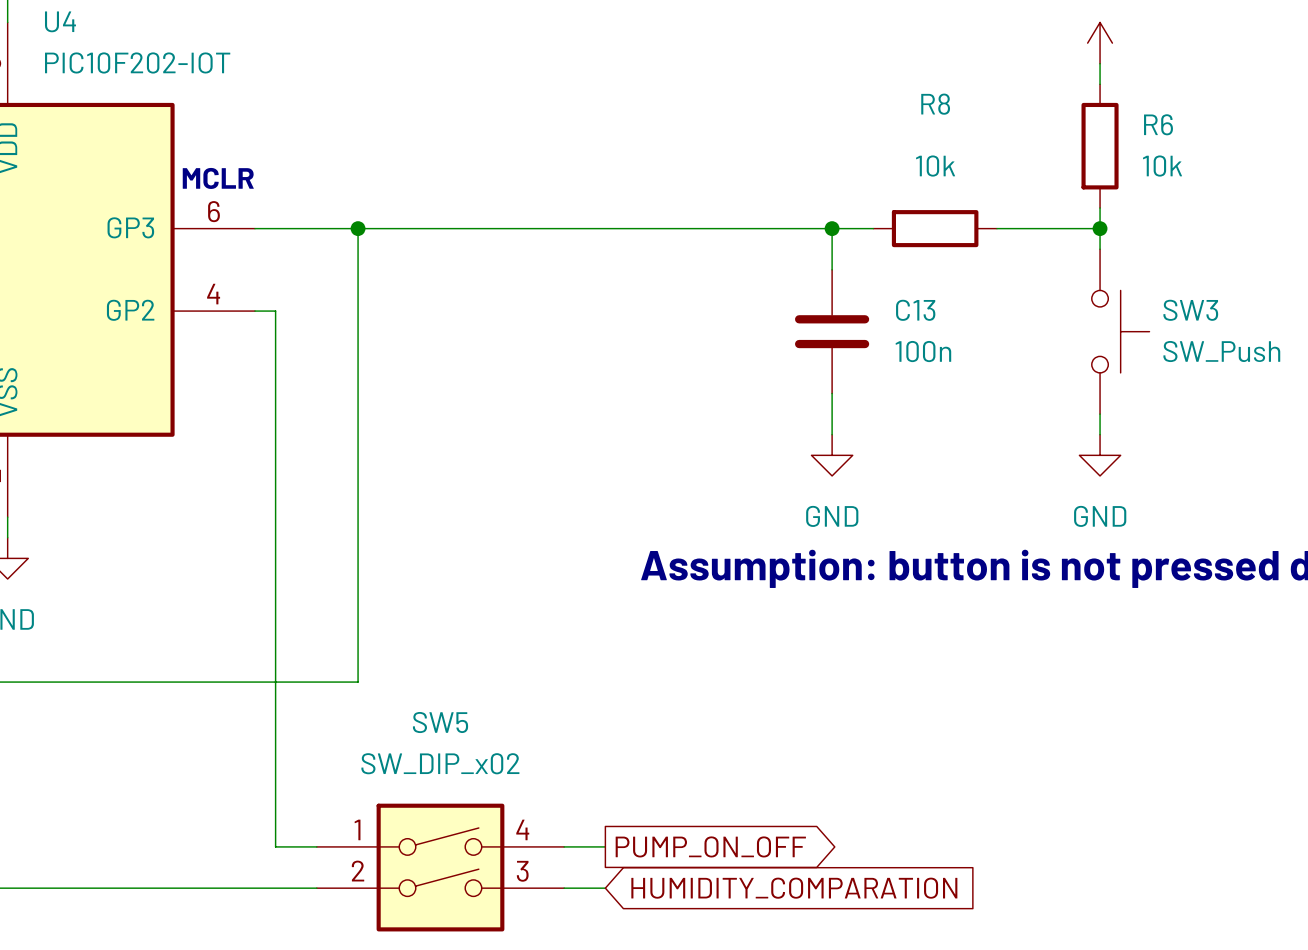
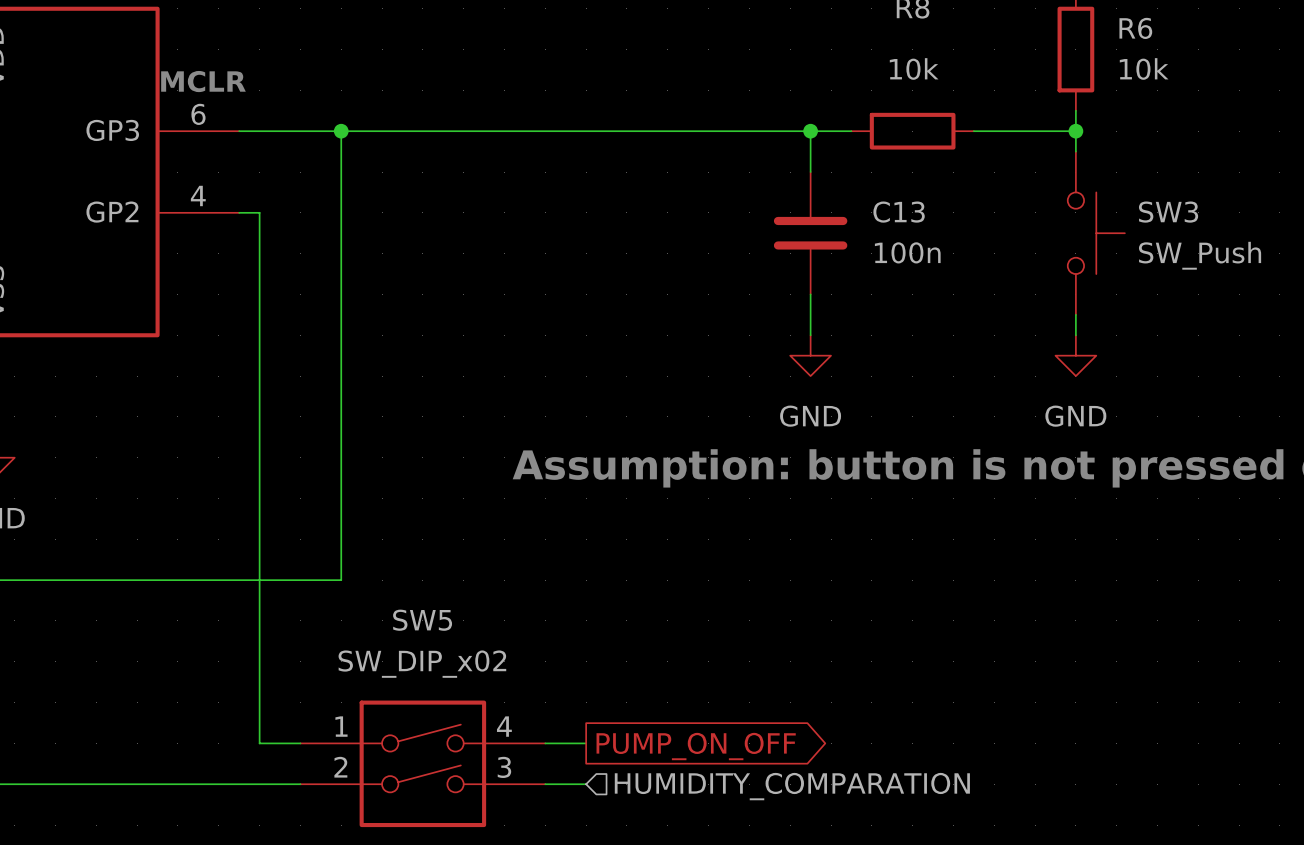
hierarchical label: none -> HUMIDITY_COMPARATION (792, 786)
global label: HUMIDITY_COMPARATION (794, 888) -> none

